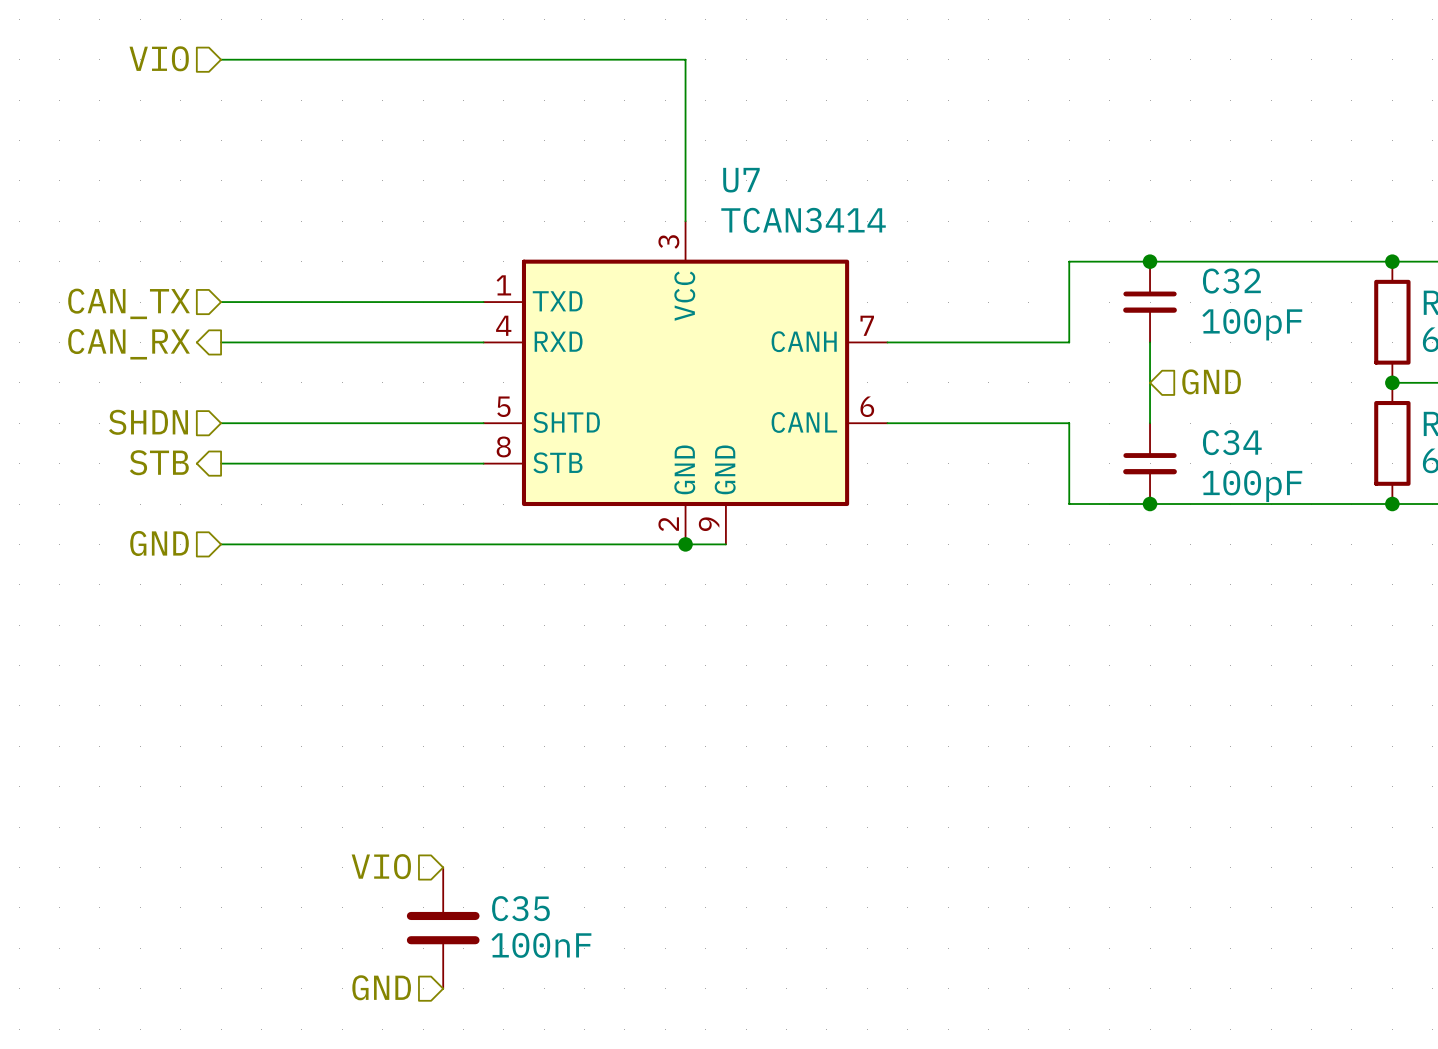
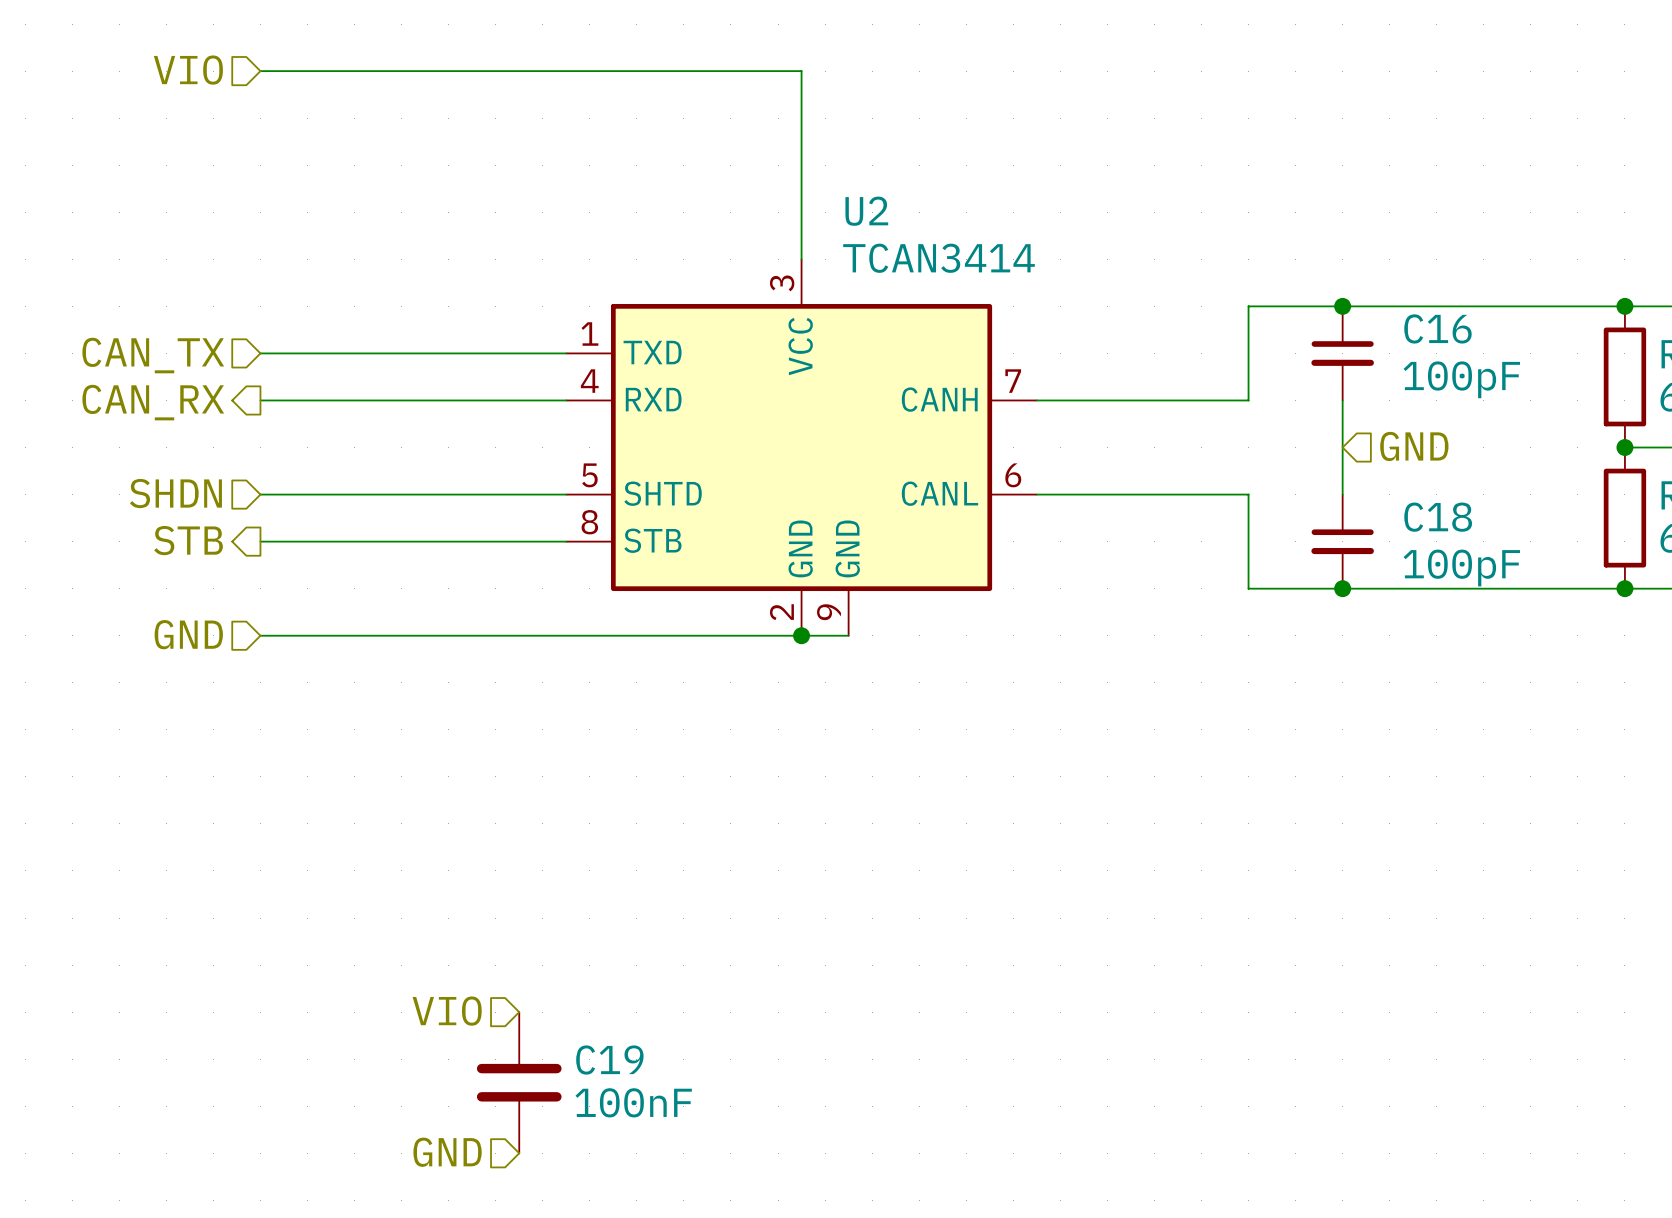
U7 name: U7 (741, 180) -> U2 (866, 211)
C32 name: C32 (1231, 281) -> C16 (1437, 328)
C34 name: C34 (1232, 442) -> C18 (1438, 517)
C35 name: C35 (520, 908) -> C19 (609, 1060)

